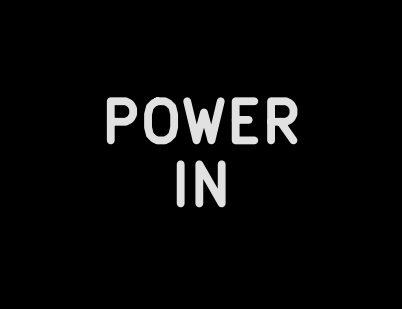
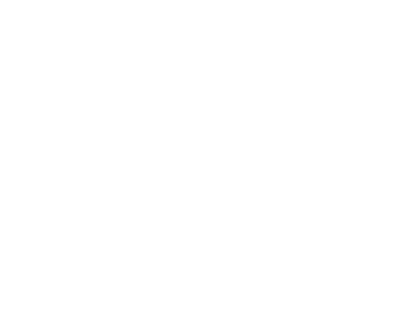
text: POWER (202, 120) -> none
text: IN (201, 183) -> none

